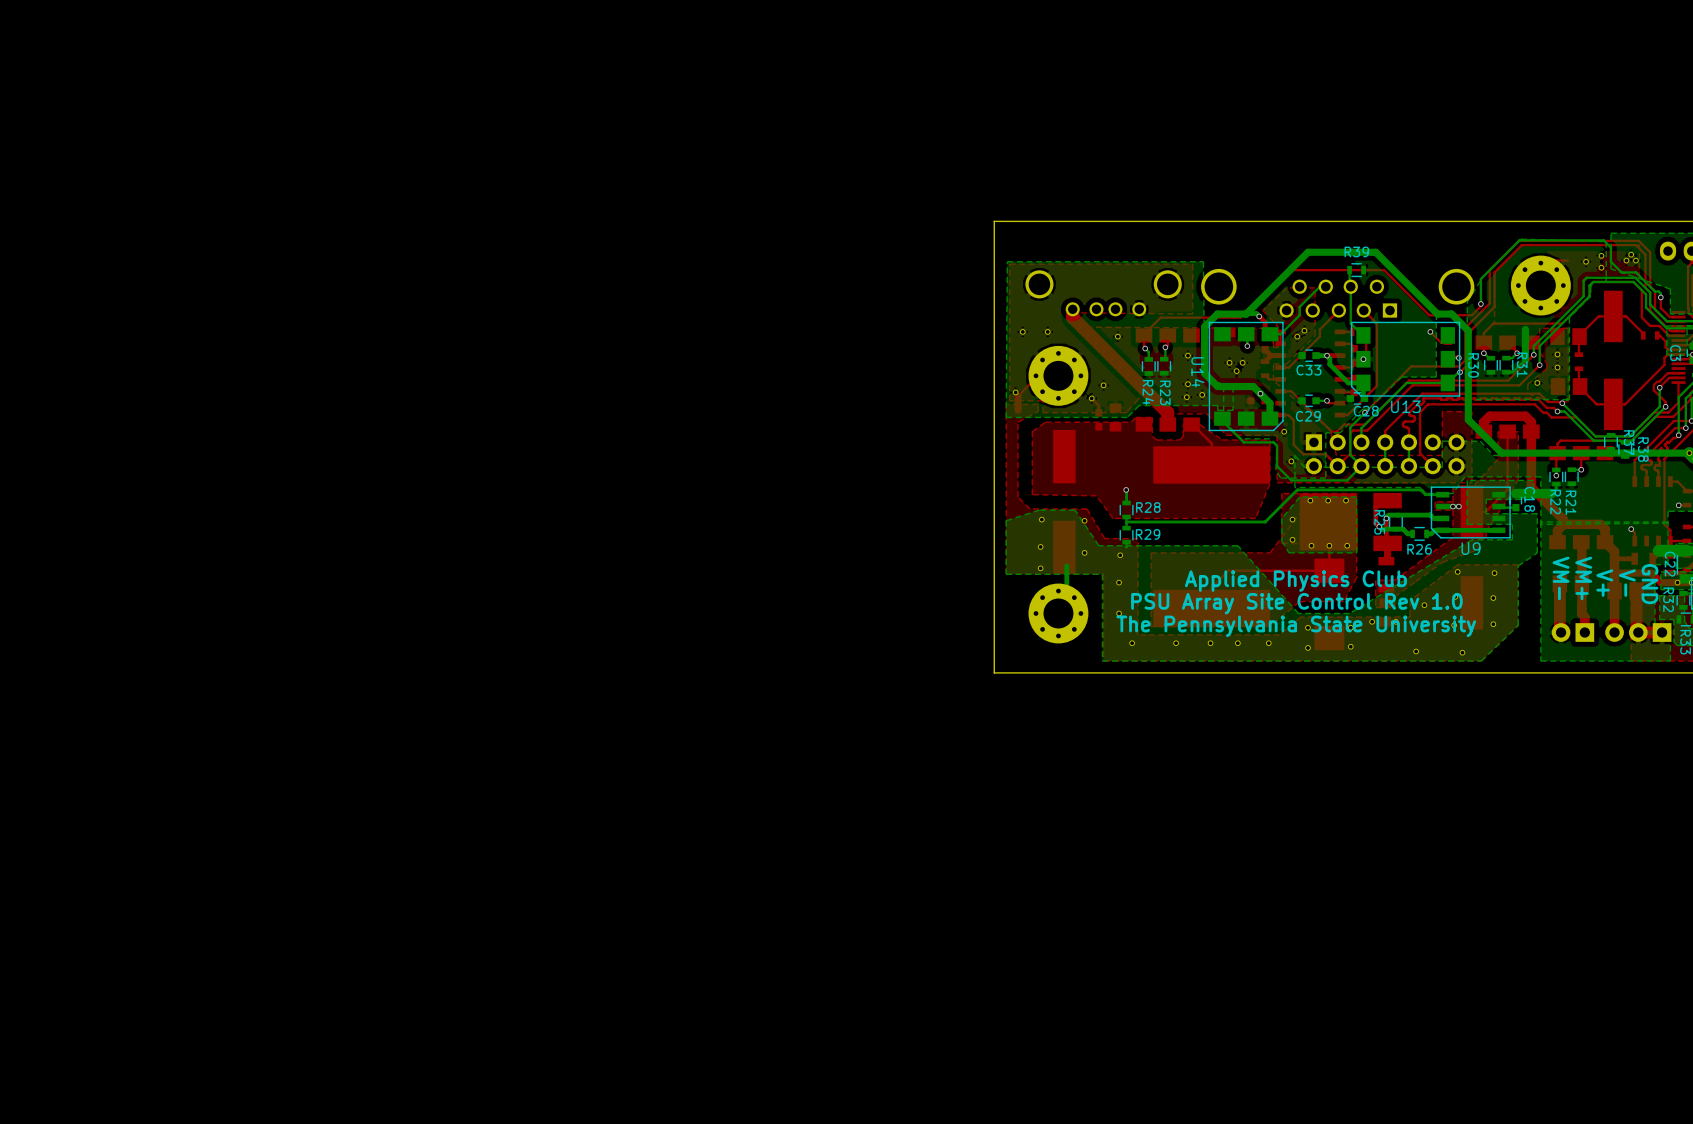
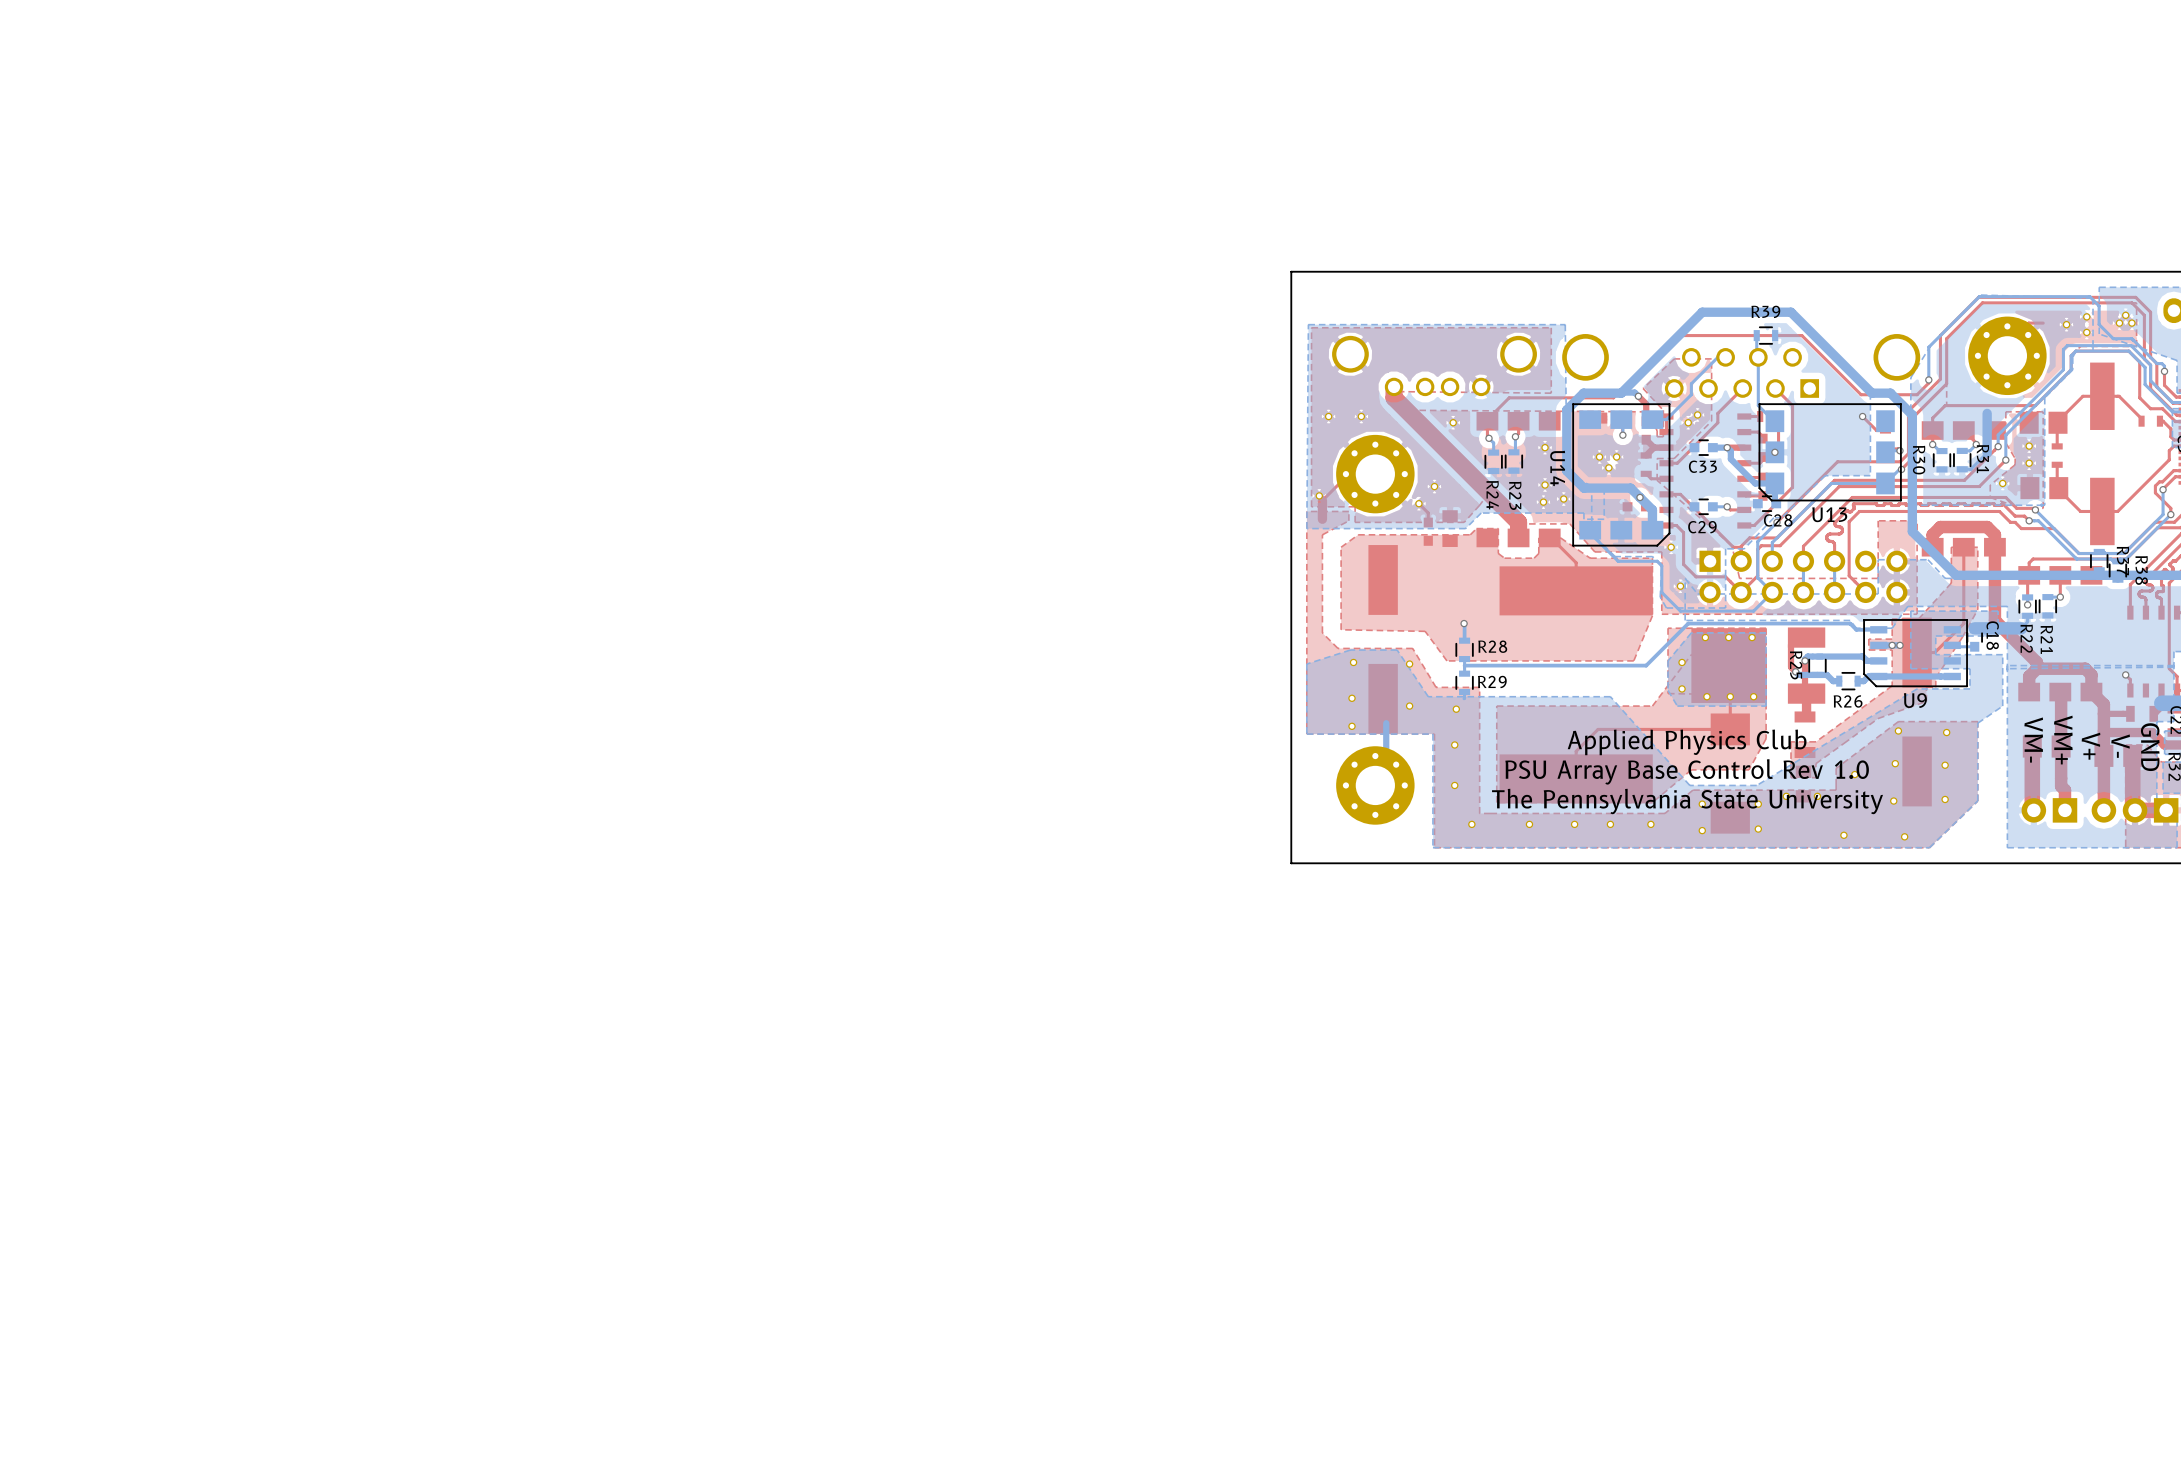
text: PSU Array Site Control Rev 1.0 (1296, 603) -> PSU Array Base Control Rev 1.0 (1687, 771)

